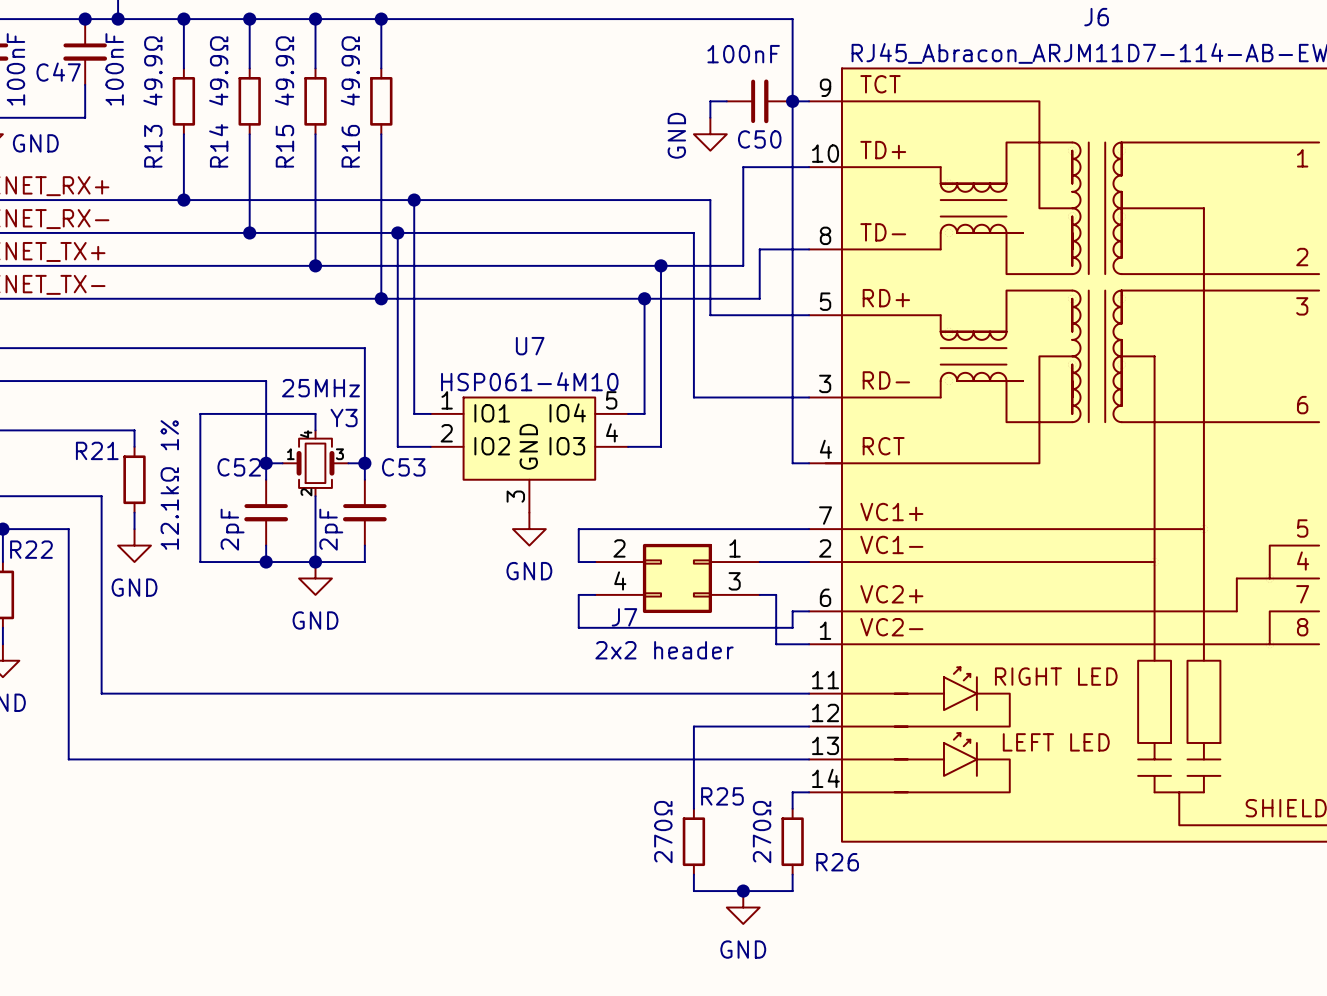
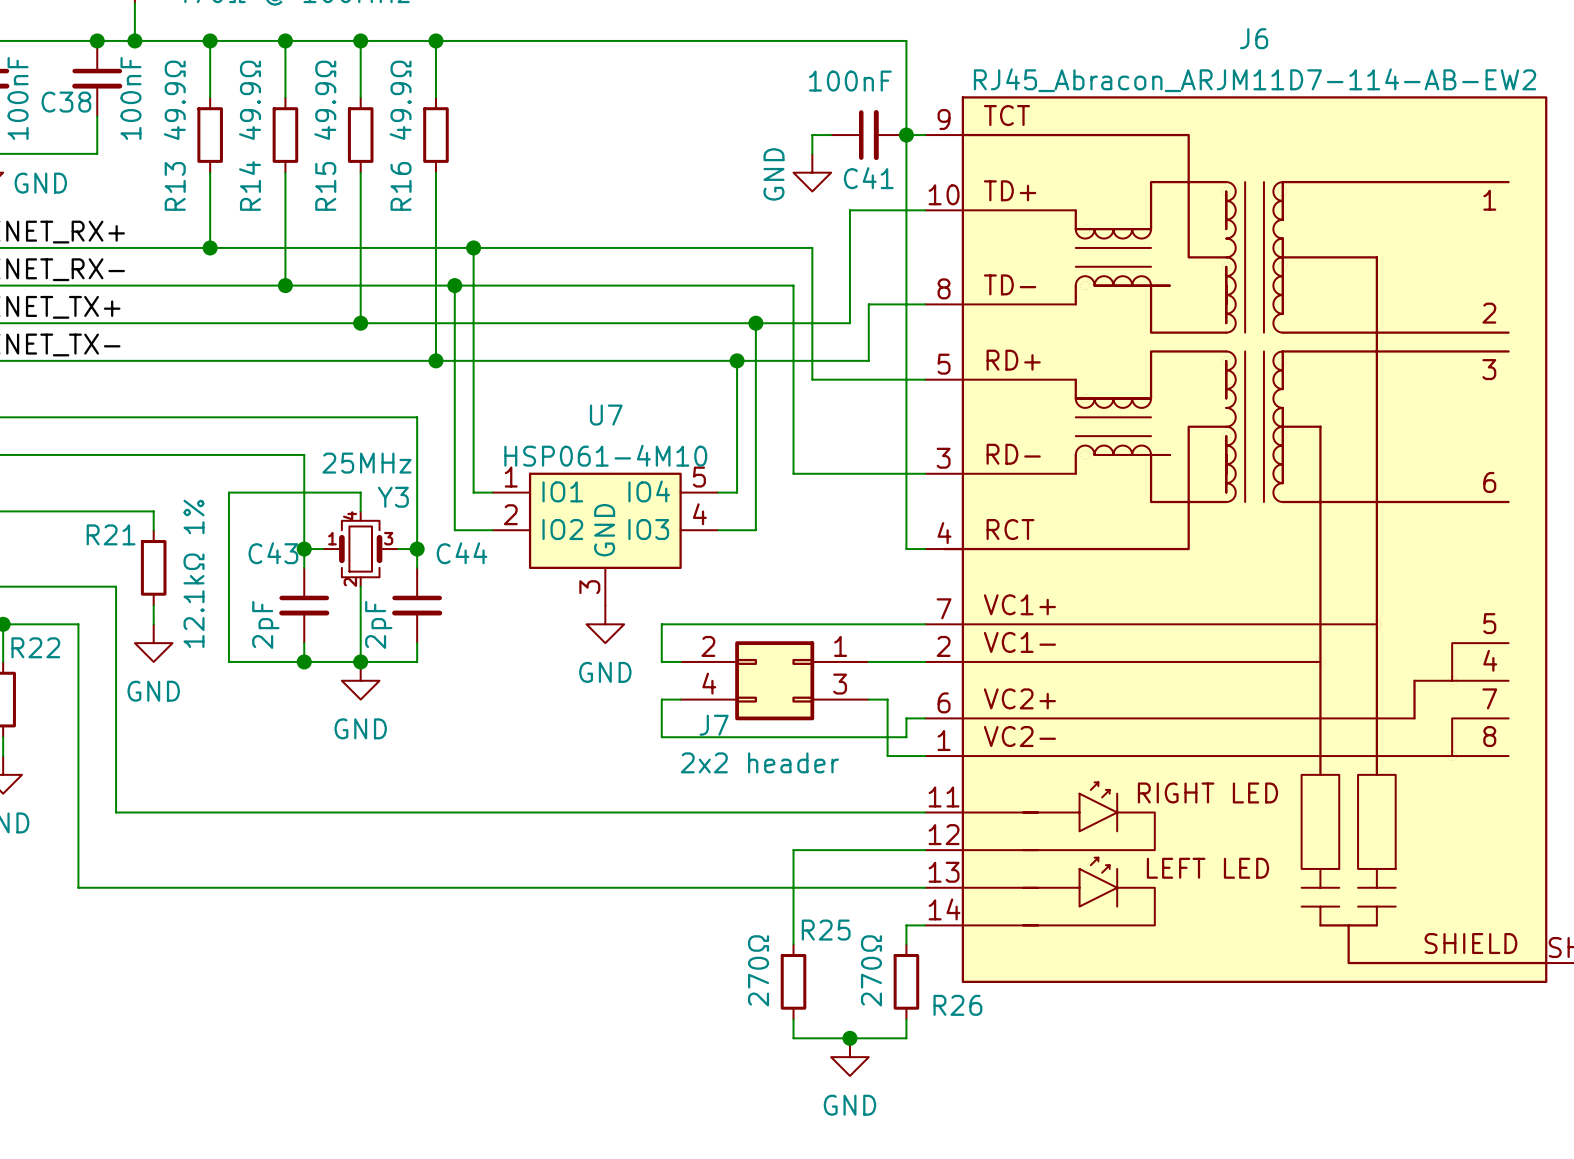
C47 name: C47 (58, 72) -> C38 (66, 102)
C50 name: C50 (759, 139) -> C41 (868, 178)
C52 name: C52 (239, 467) -> C43 (273, 553)
C53 name: C53 (403, 467) -> C44 (462, 553)

